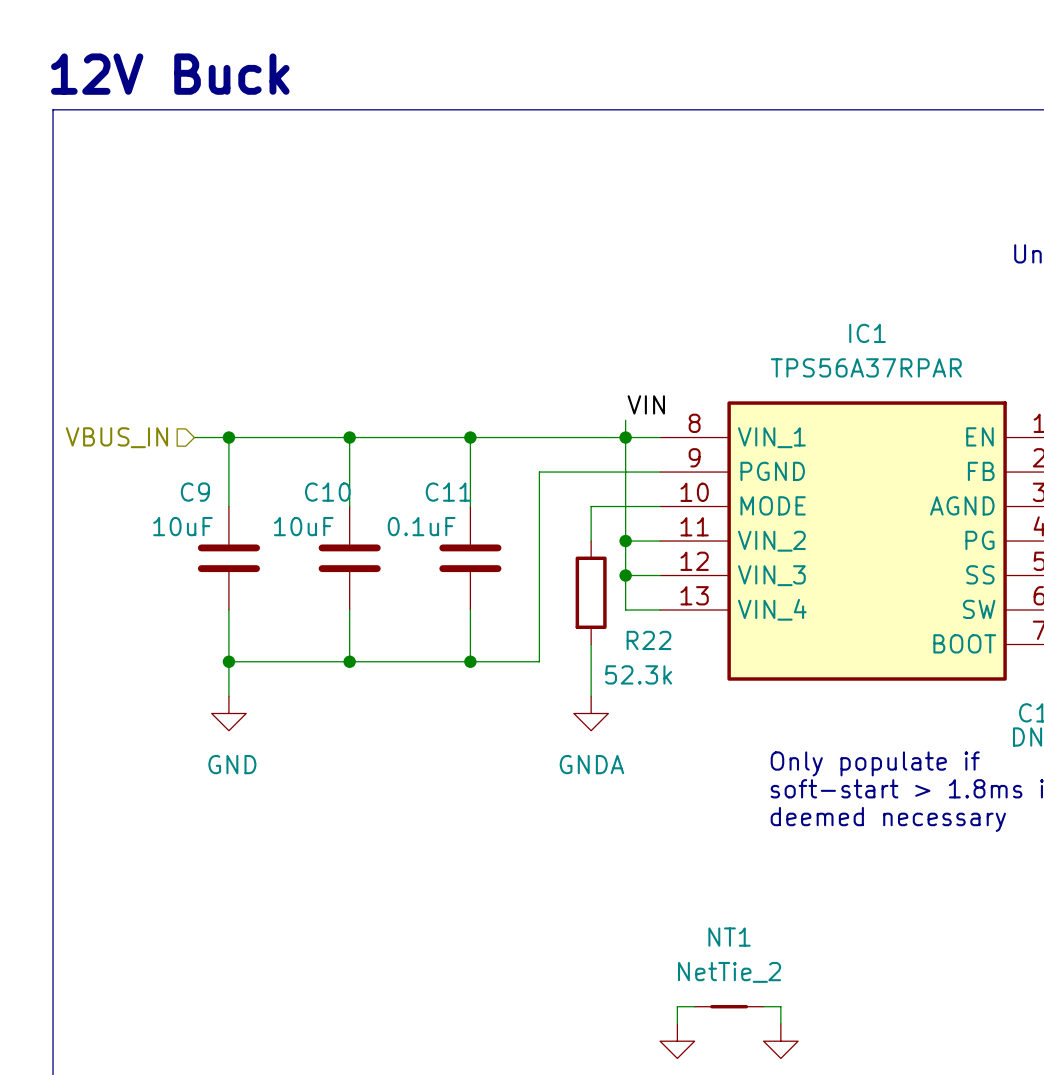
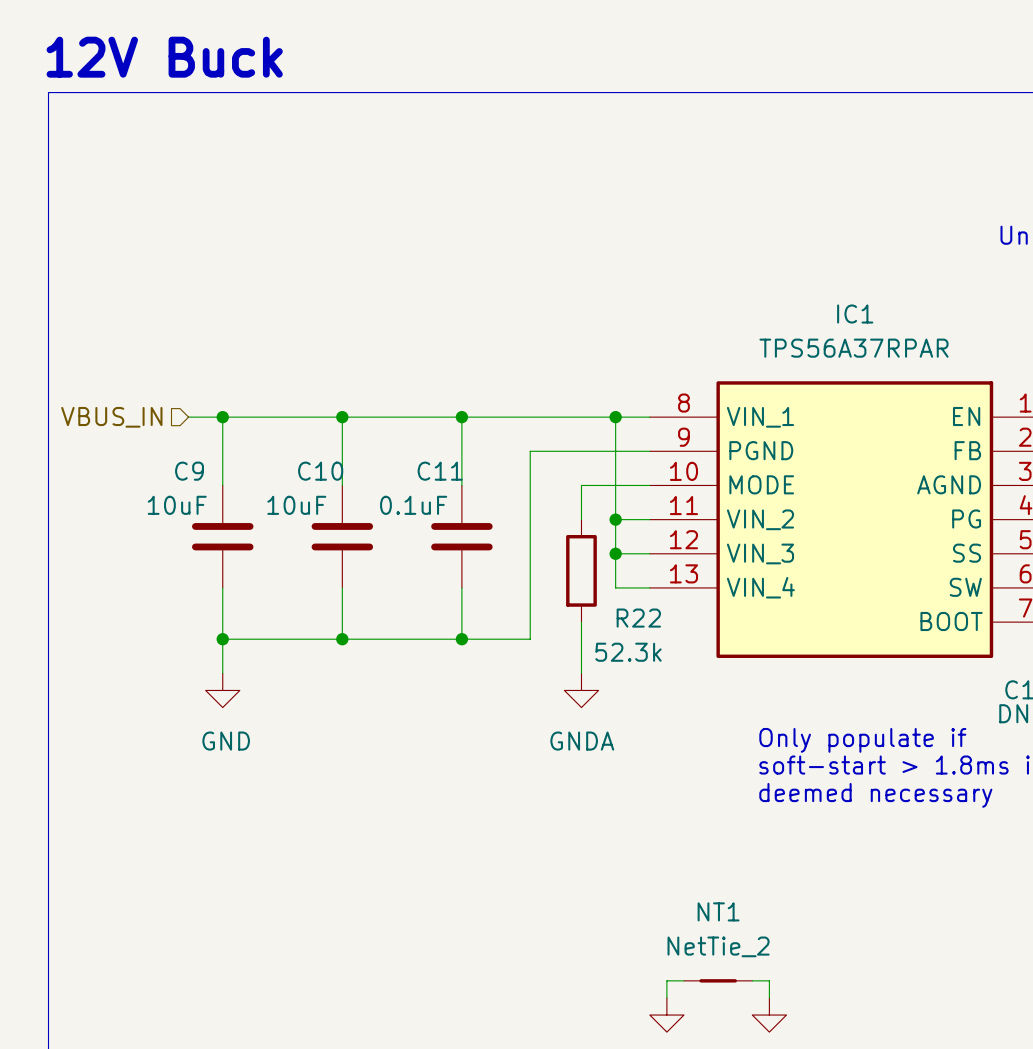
label: VIN (646, 404) -> none
wire: (625, 420) (625, 437) -> none

